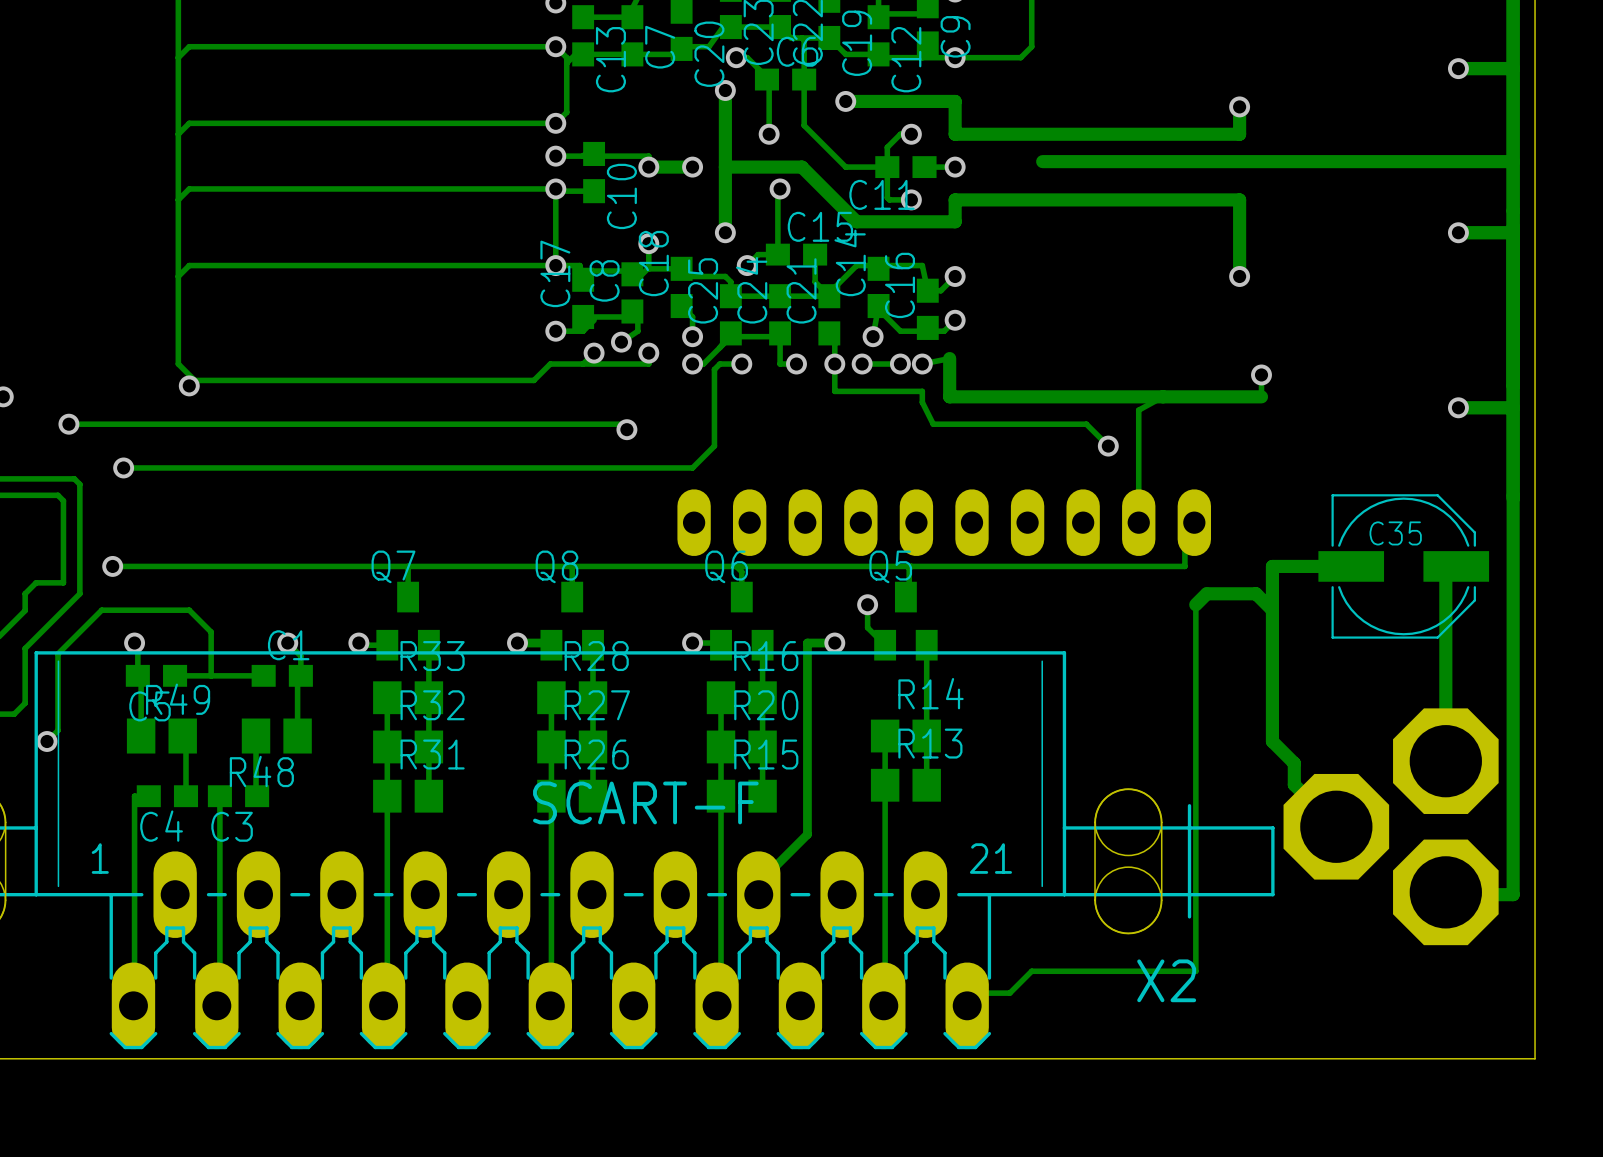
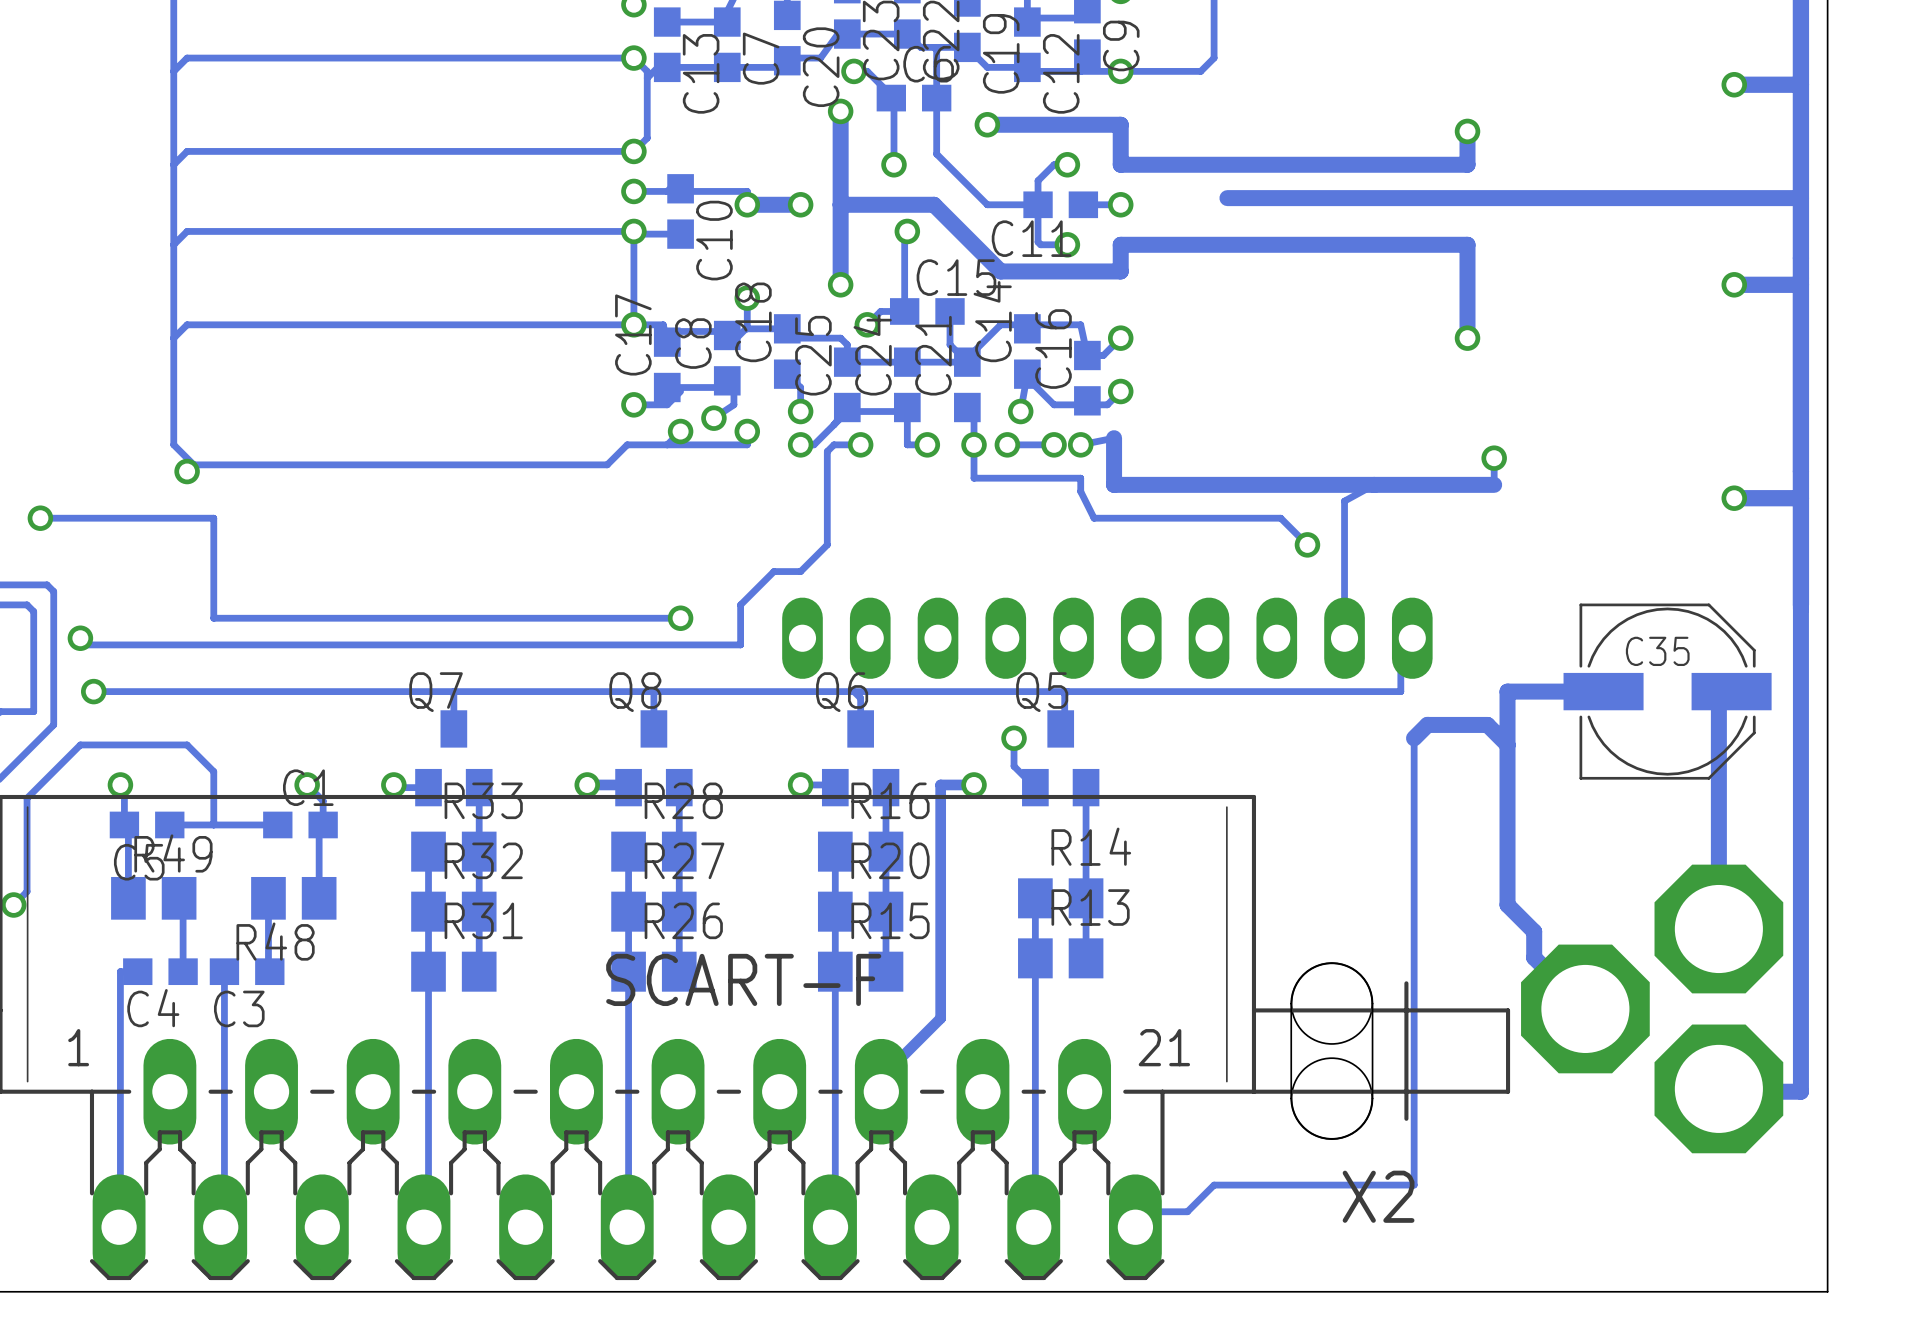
track: (211, 424) (626, 424) (626, 429) -> (213, 518) (213, 618) (680, 618)
via position: (626, 429) -> (680, 618)
via position: (123, 467) -> (80, 638)
track: (670, 467) (123, 467) -> (773, 571) (740, 604) (740, 644) (87, 644) (80, 638)

